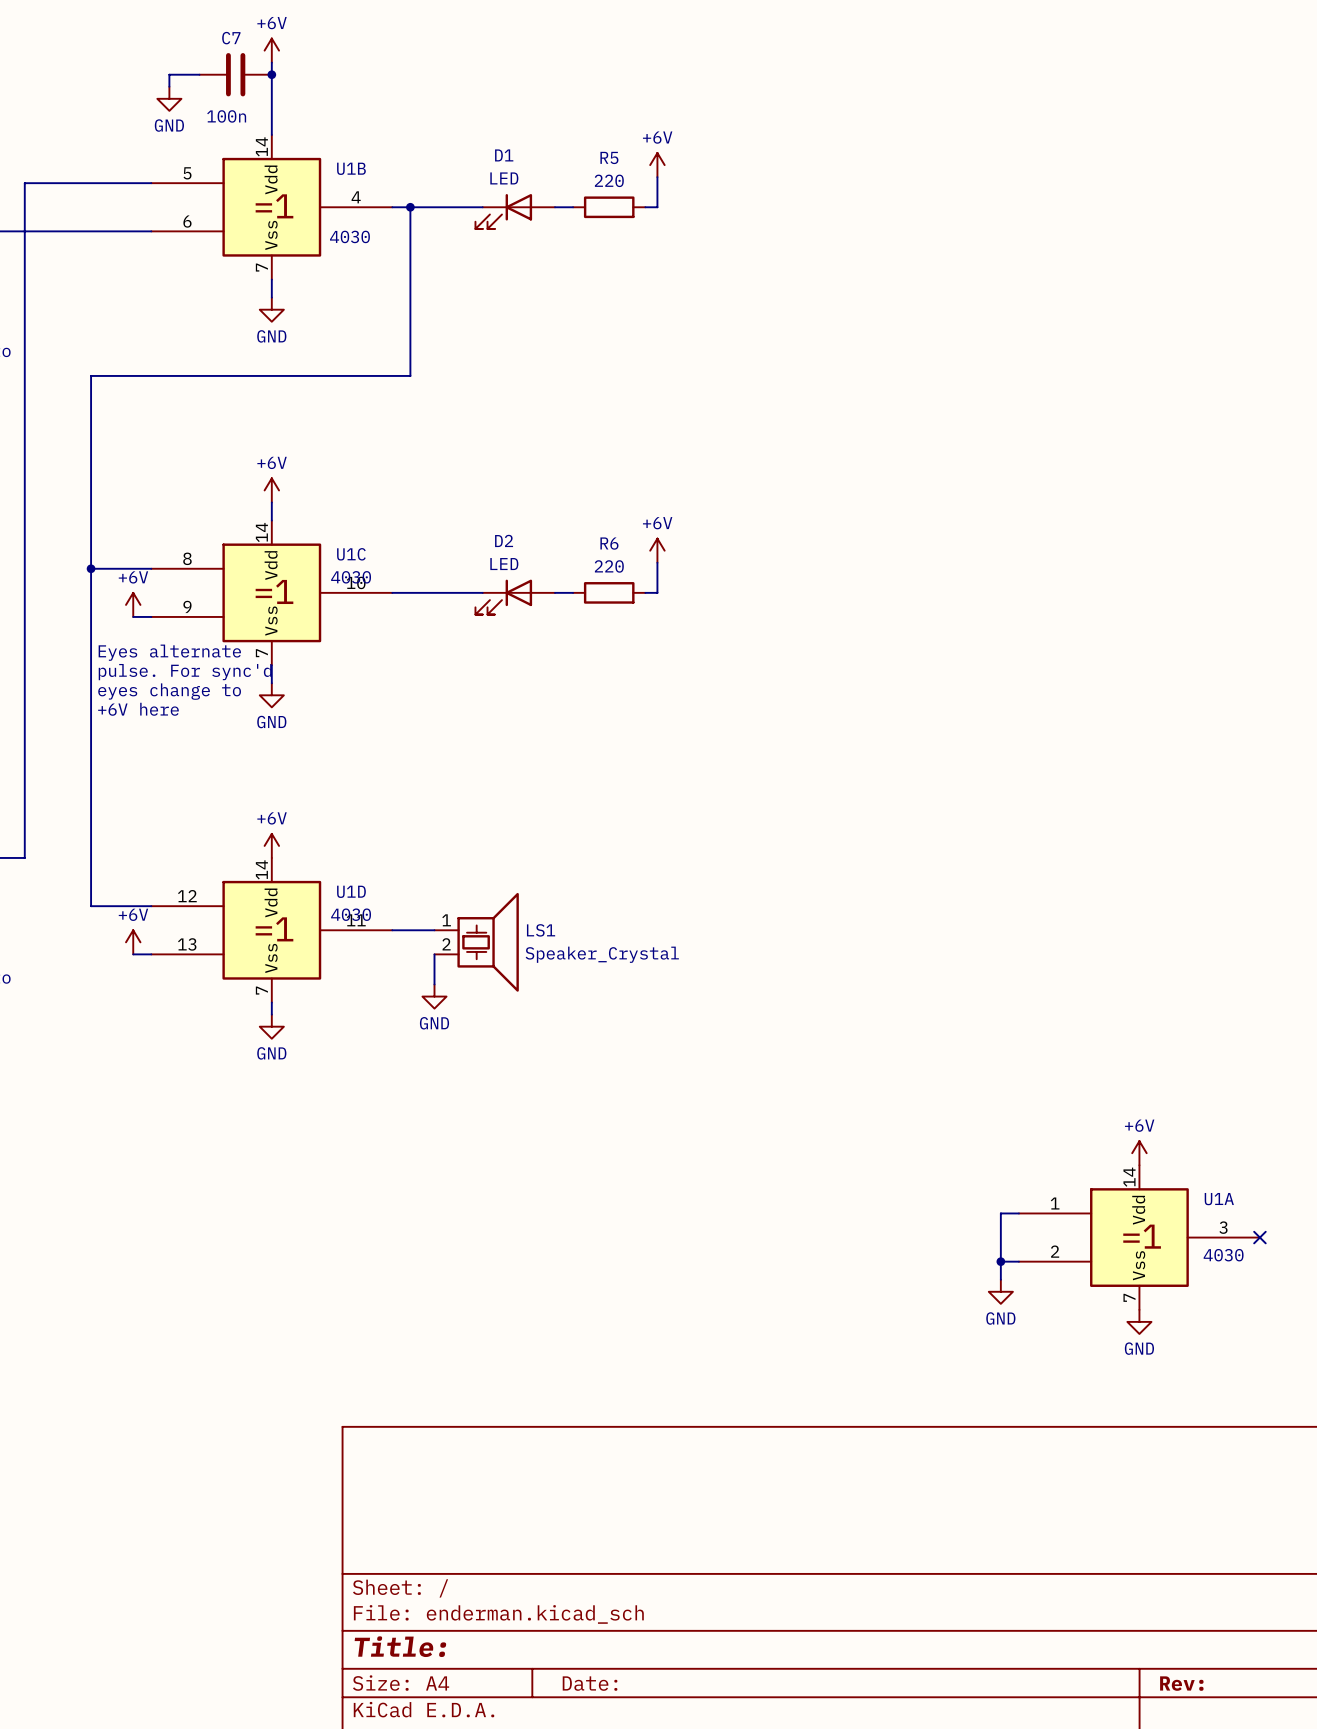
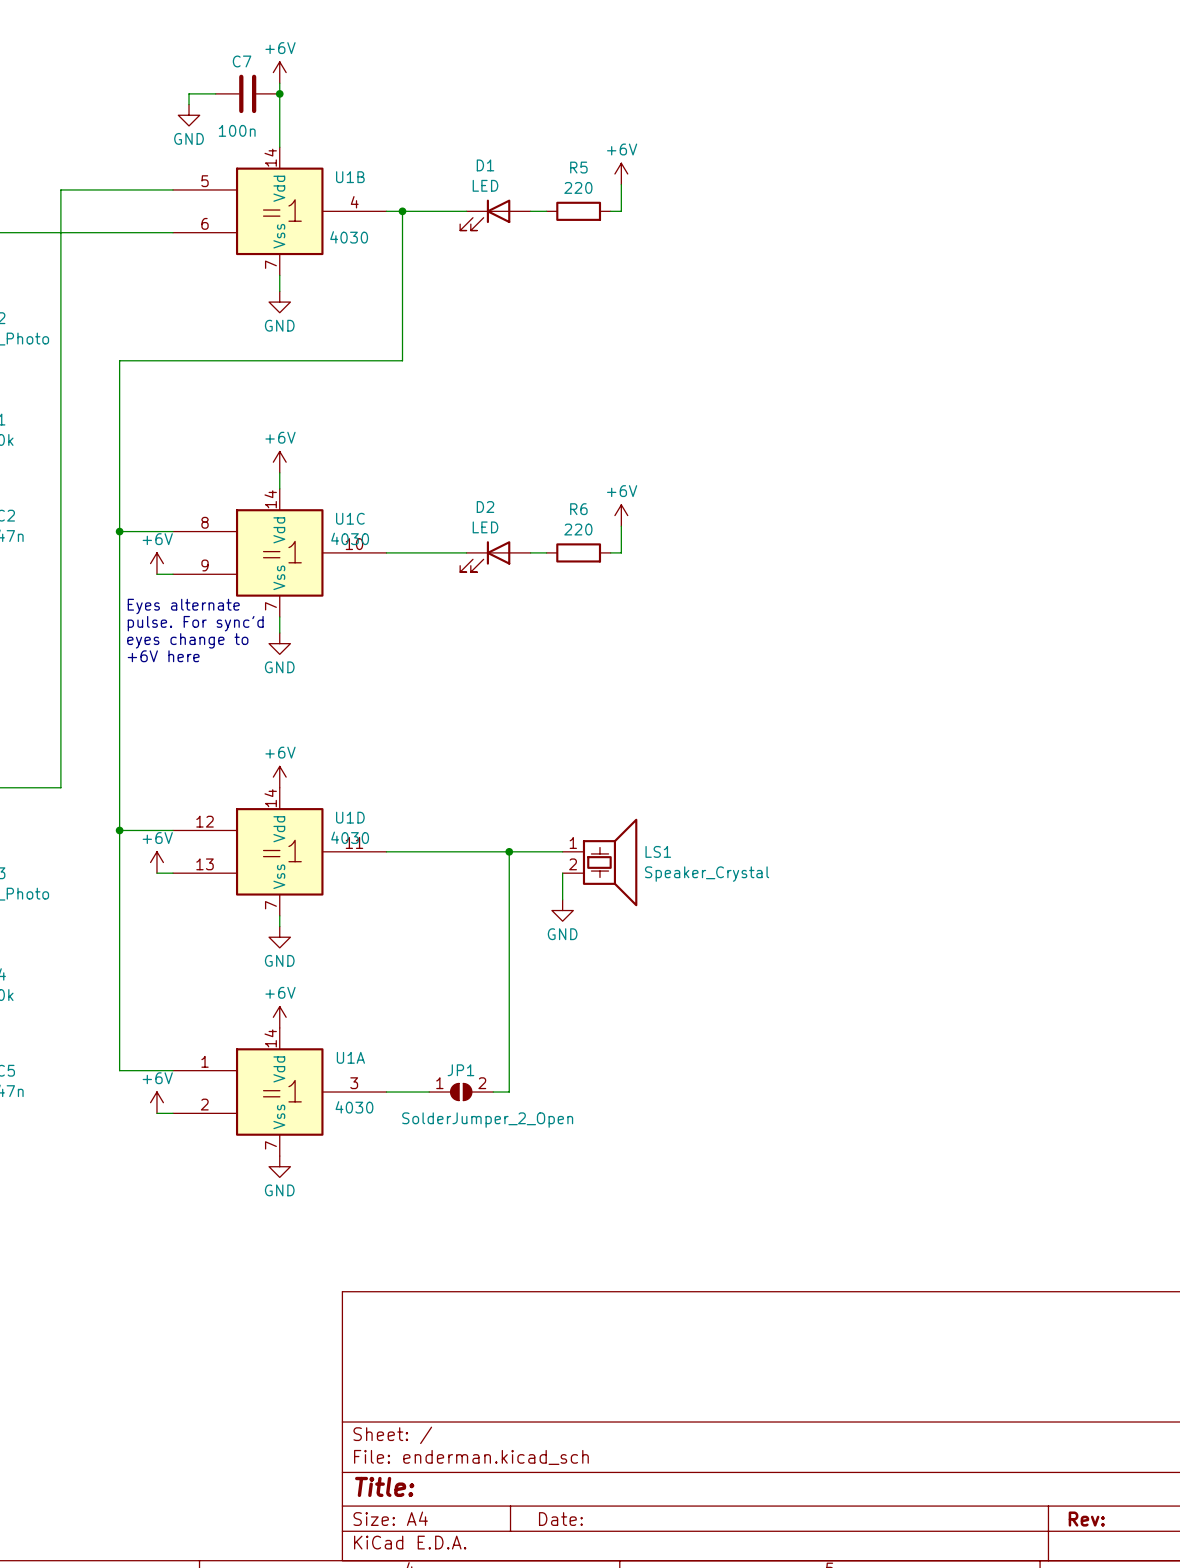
wire: none -> (119, 830) (119, 1070) (173, 1070)
junction: none -> (119, 830)
wire: none -> (423, 851) (562, 851)
wire: none -> (509, 851) (509, 1092) (493, 1092)
junction: none -> (509, 851)
LS1 position: (476, 942) -> (599, 862)
wire: (434, 954) (434, 984) -> (562, 873) (562, 899)
power symbol position: GND (434, 996) -> GND (562, 910)
power symbol: none -> +6V (279, 1017)
power symbol: +6V (1139, 1153) -> none
wire: none -> (386, 1092) (429, 1092)
JP1: none -> SolderJumper_2_Open (461, 1092)
power symbol: none -> +6V (156, 1102)
wire: (1018, 1213) (1000, 1213) (1000, 1279) -> none
wire: none -> (156, 1113) (173, 1113)
U1A position: (1139, 1237) -> (279, 1092)
no-connect mark: (1259, 1237) -> none
wire: (1000, 1261) (1018, 1261) -> none
junction: (1000, 1261) -> none
power symbol: none -> GND (279, 1166)
power symbol: GND (1000, 1291) -> none
power symbol: GND (1139, 1321) -> none

